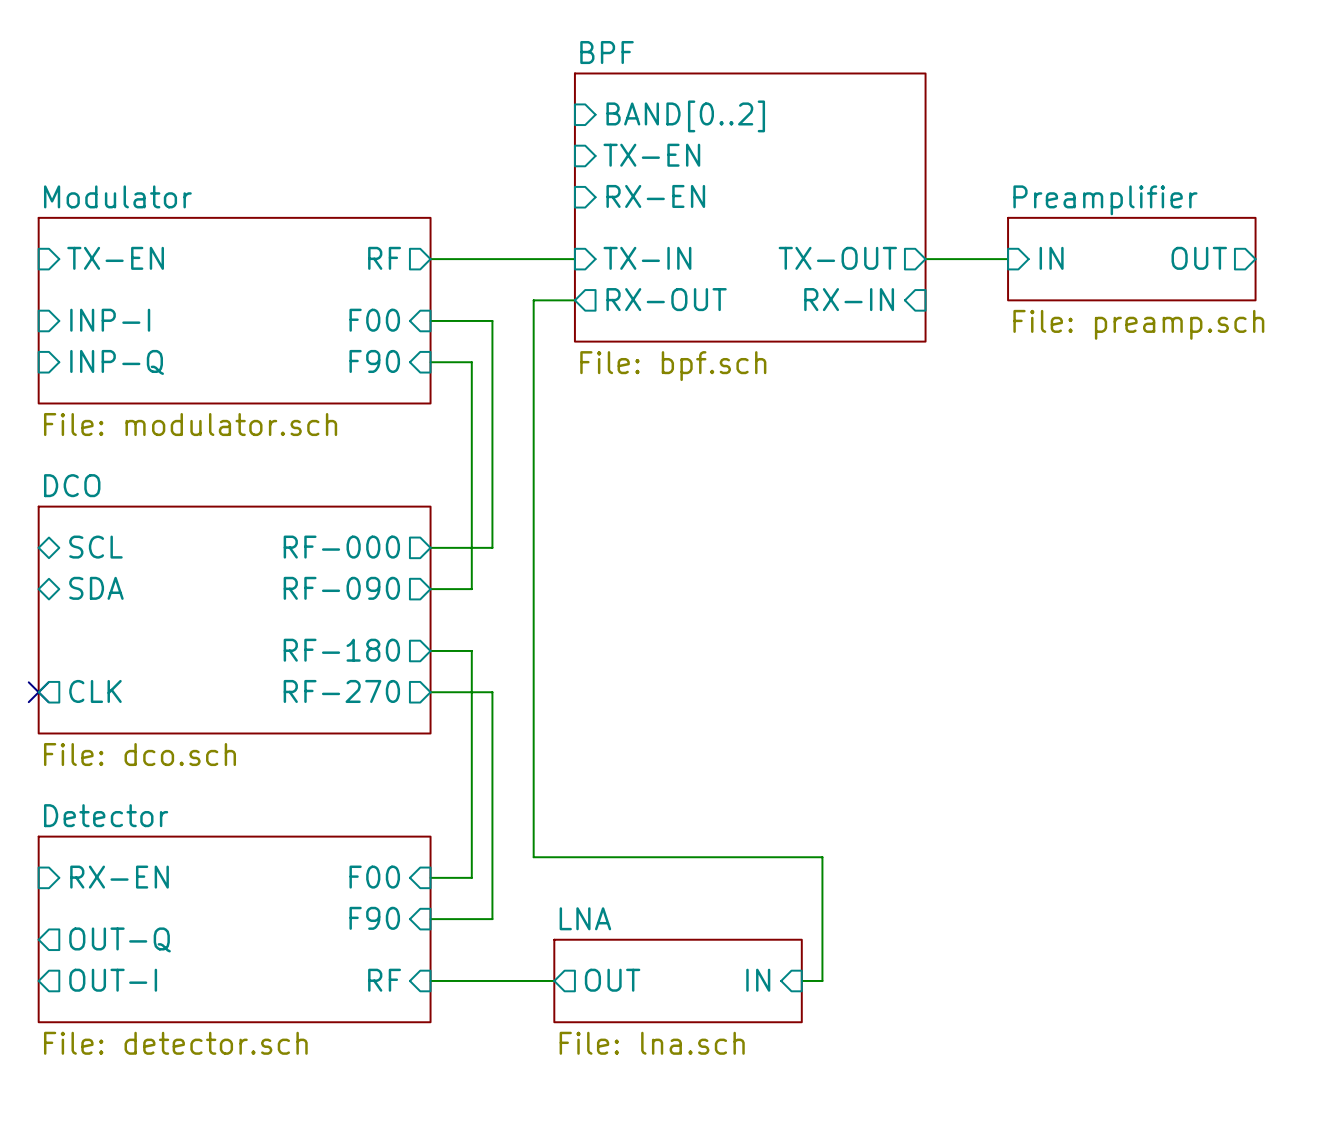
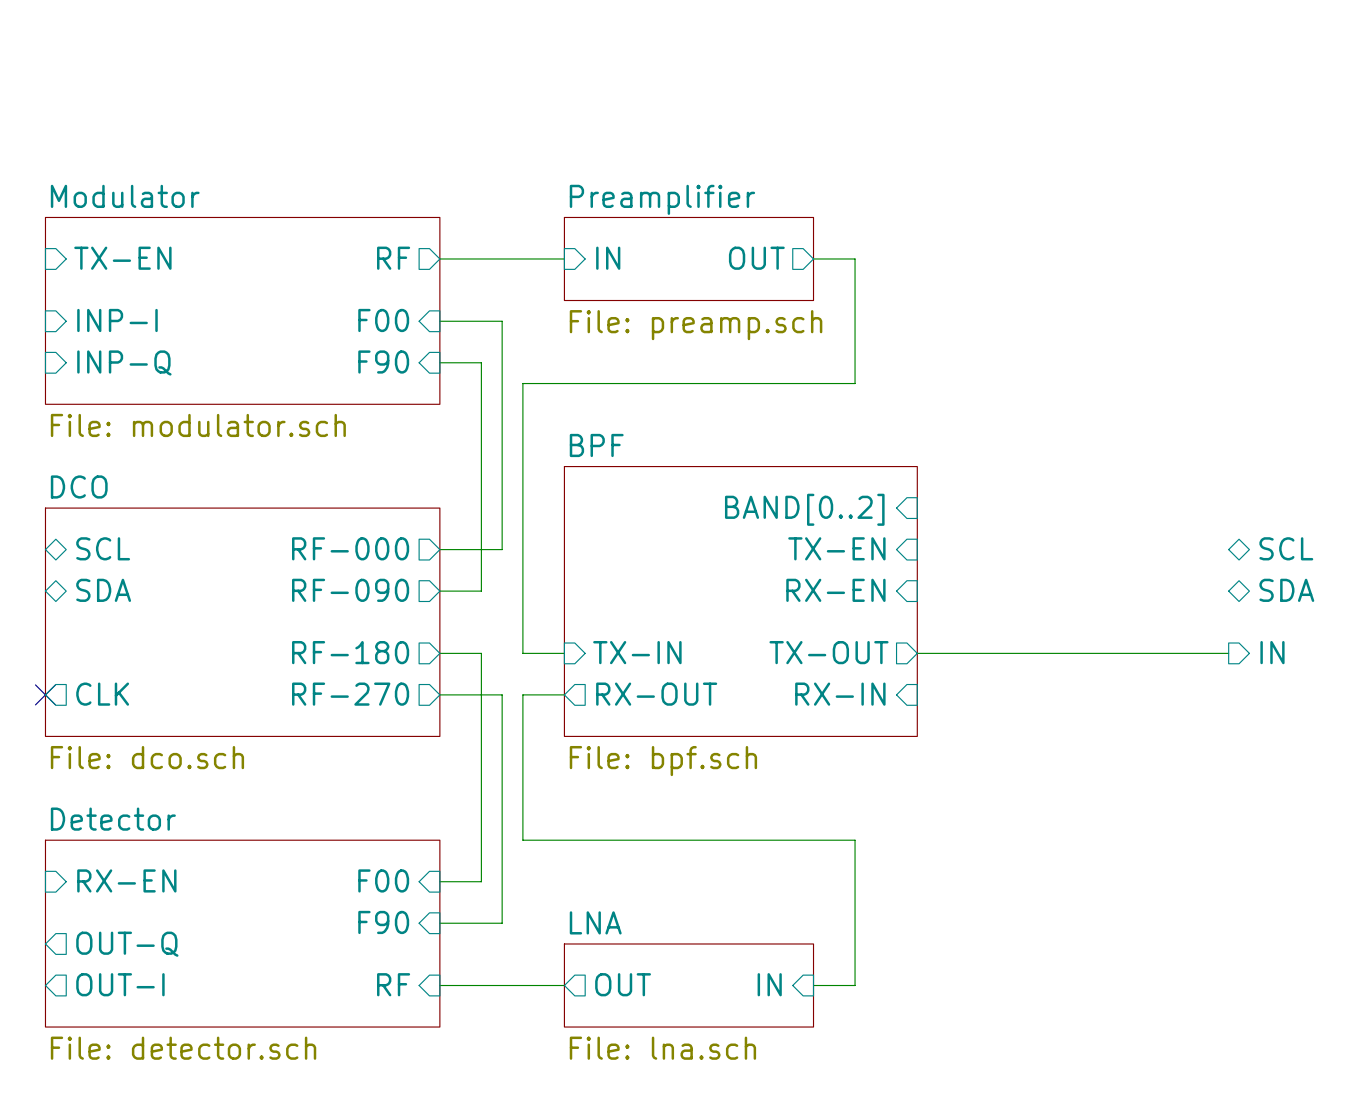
sheet pin: BAND[0..2] (685, 116) -> none
sheet pin: TX-EN (651, 155) -> none
sheet pin: RX-EN (655, 196) -> none
sheet BPF position: (750, 207) -> (740, 601)
sheet pin: none -> IN (608, 258)
sheet pin position: TX-IN (647, 258) -> TX-IN (637, 652)
sheet pin: none -> OUT (756, 258)
sheet pin position: TX-OUT (837, 258) -> TX-OUT (829, 652)
sheet pin: IN (1051, 258) -> none
sheet pin: OUT (1199, 258) -> none
wire: (554, 259) (574, 259) -> none
sheet Preamplifier: none -> File: preamp.sch (688, 258)
wire: none -> (813, 258) (855, 258) (855, 383) (522, 383) (522, 653) (564, 653)
wire: (925, 259) (1008, 259) -> none
sheet Preamplifier: File: preamp.sch (1131, 259) -> none
sheet pin position: RX-OUT (666, 299) -> RX-OUT (656, 694)
sheet pin position: RX-IN (849, 299) -> RX-IN (840, 694)
wire: (574, 300) (533, 300) (533, 857) (822, 857) (822, 980) -> (564, 694) (522, 694) (522, 840) (855, 840) (855, 985) (834, 985)
sheet pin: none -> BAND[0..2] (804, 509)
sheet pin: none -> TX-EN (836, 548)
sheet pin: none -> SCL (1286, 548)
sheet pin: none -> RX-EN (835, 590)
sheet pin: none -> SDA (1286, 590)
wire: none -> (917, 653) (1228, 653)
sheet pin: none -> IN (1272, 652)

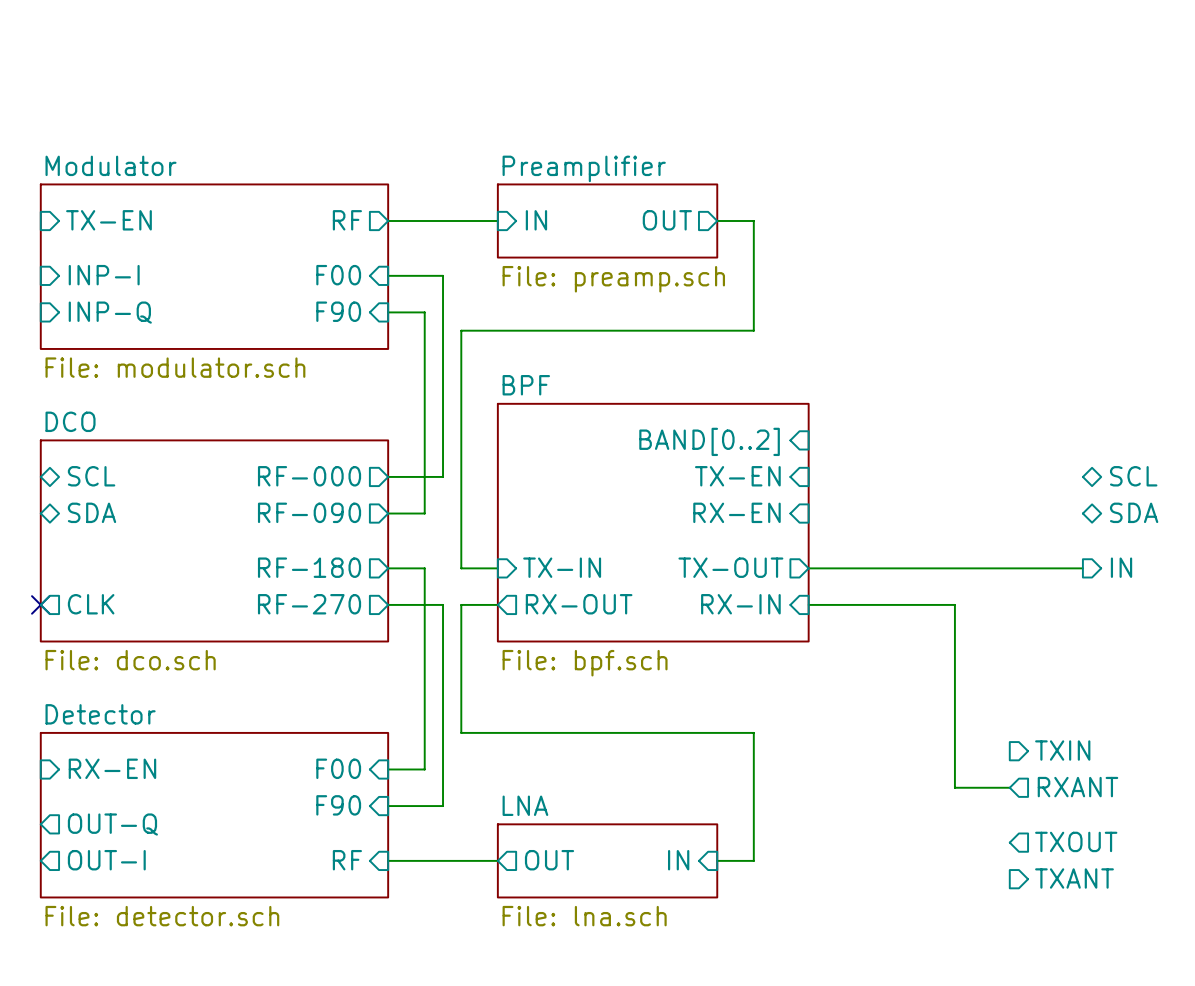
wire: none -> (808, 604) (954, 604) (954, 787) (1009, 787)
sheet pin: none -> TXIN (1062, 750)
sheet pin: none -> RXANT (1077, 787)
sheet pin: none -> TXOUT (1076, 841)
sheet pin: none -> TXANT (1074, 878)

